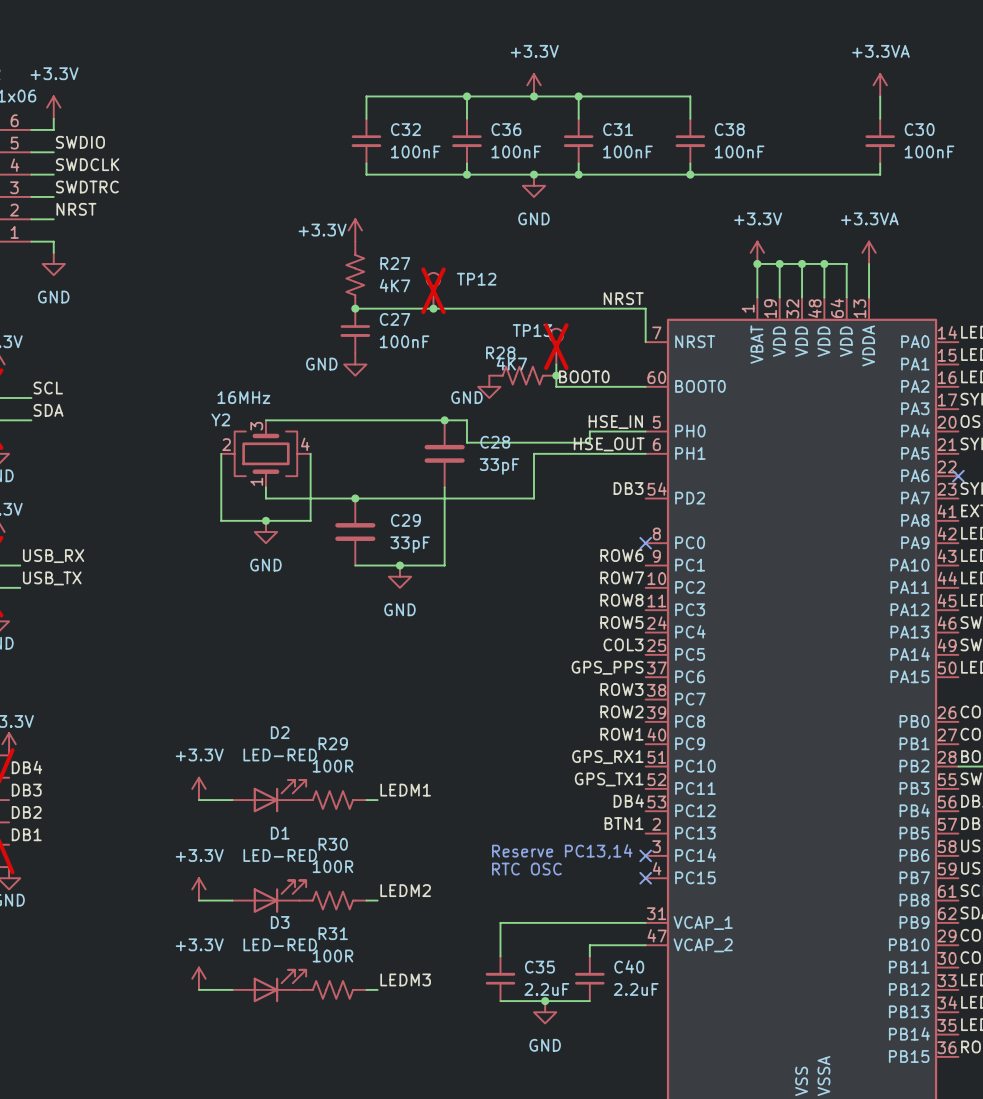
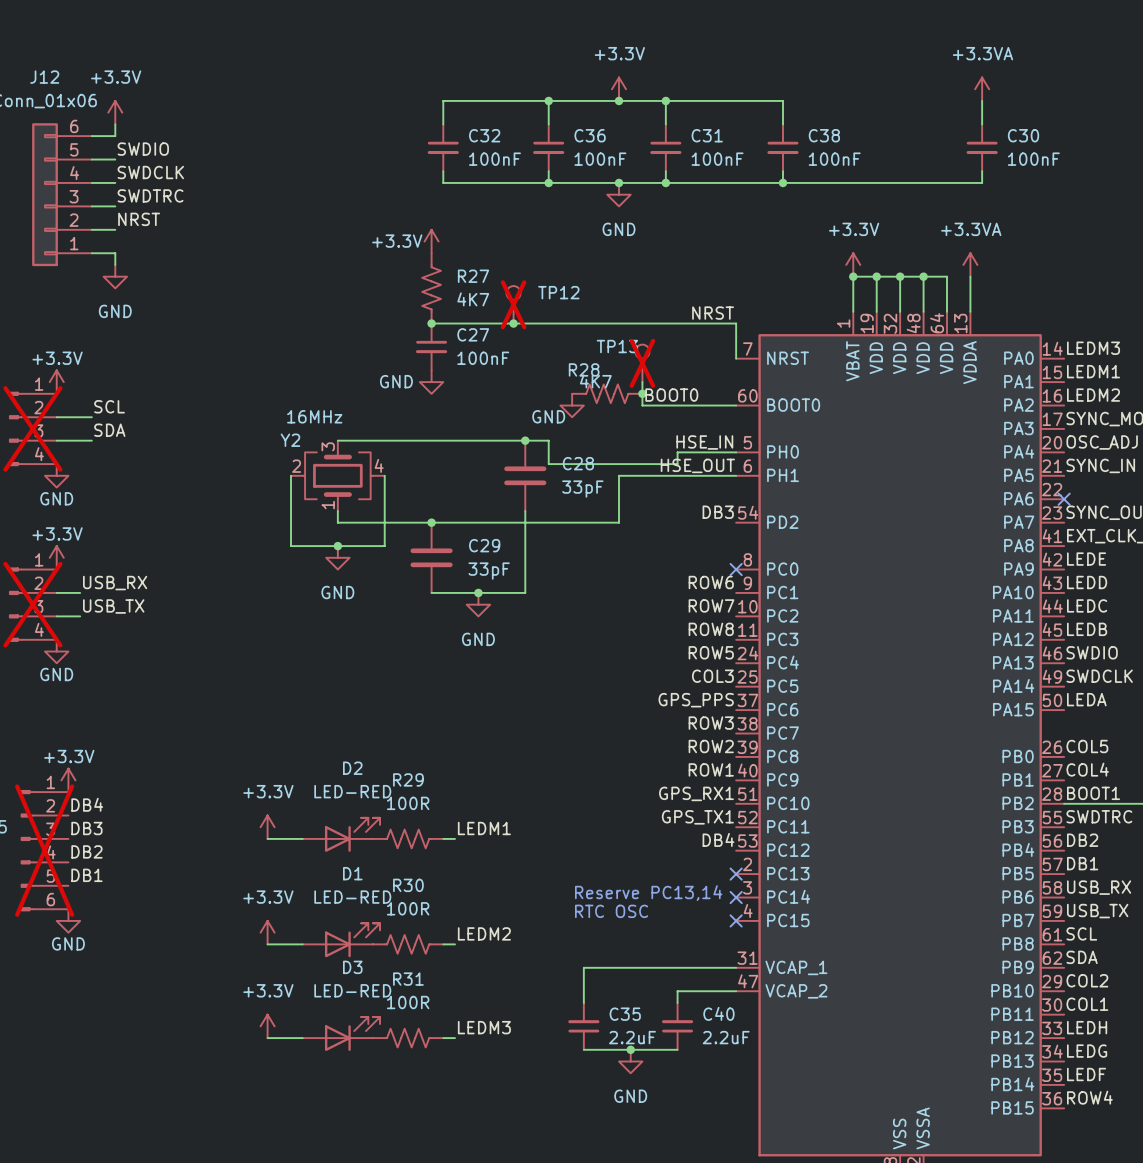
label: BTN1 (624, 823) -> none
no-connect mark: none -> (736, 874)

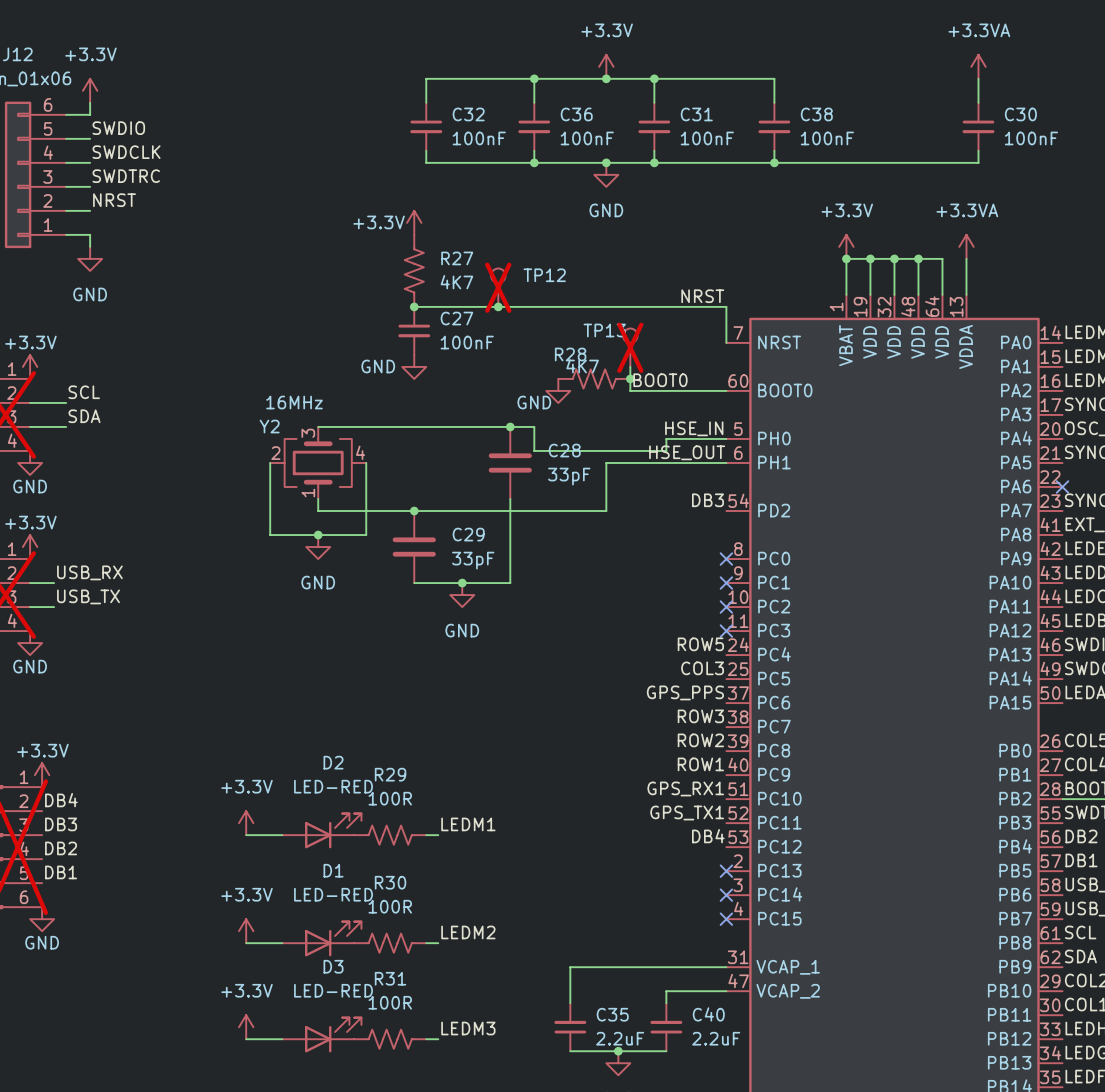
label: ROW6 (711, 582) -> none
no-connect mark: none -> (726, 583)
label: ROW7 (711, 605) -> none
no-connect mark: none -> (726, 607)
label: ROW8 (711, 629) -> none
no-connect mark: none -> (726, 631)
text: Reserve PC13,14 (648, 893) -> none
text: RTC OSC (611, 911) -> none

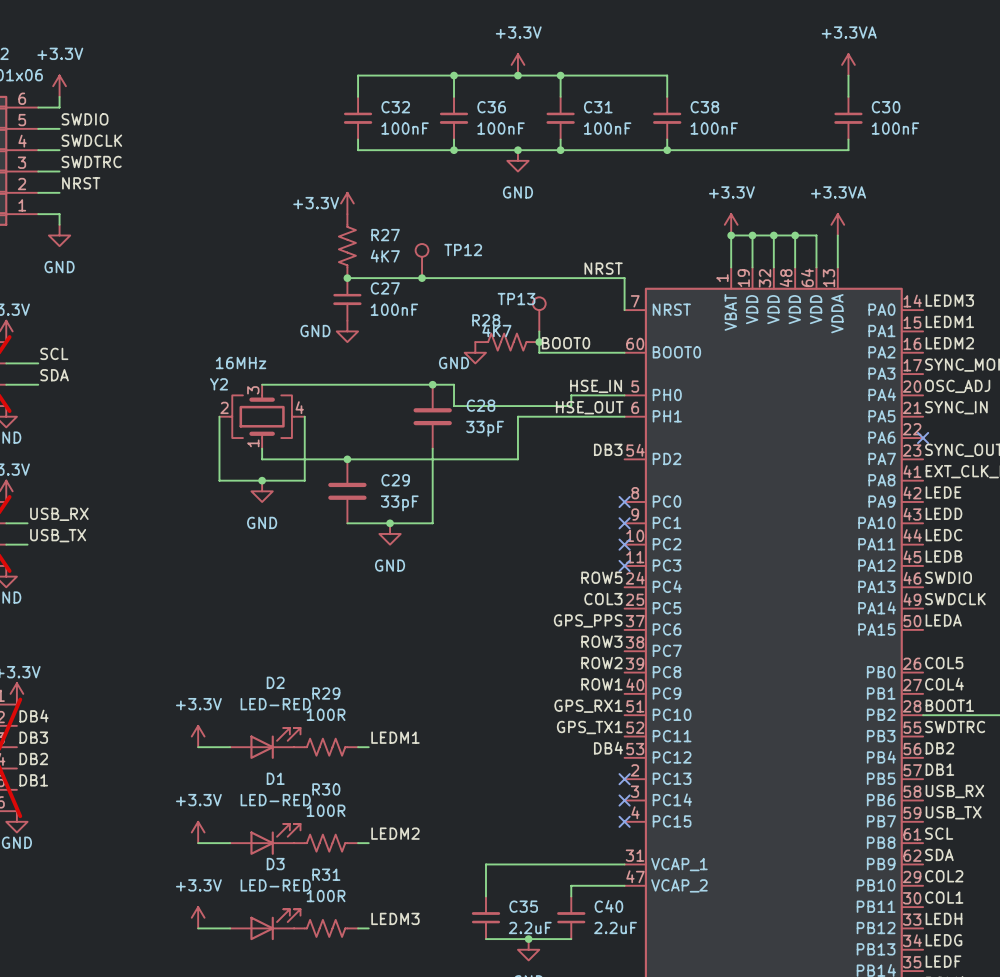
TP12 do-not-place cross: (498, 287) -> none
TP13 do-not-place cross: (630, 347) -> none

